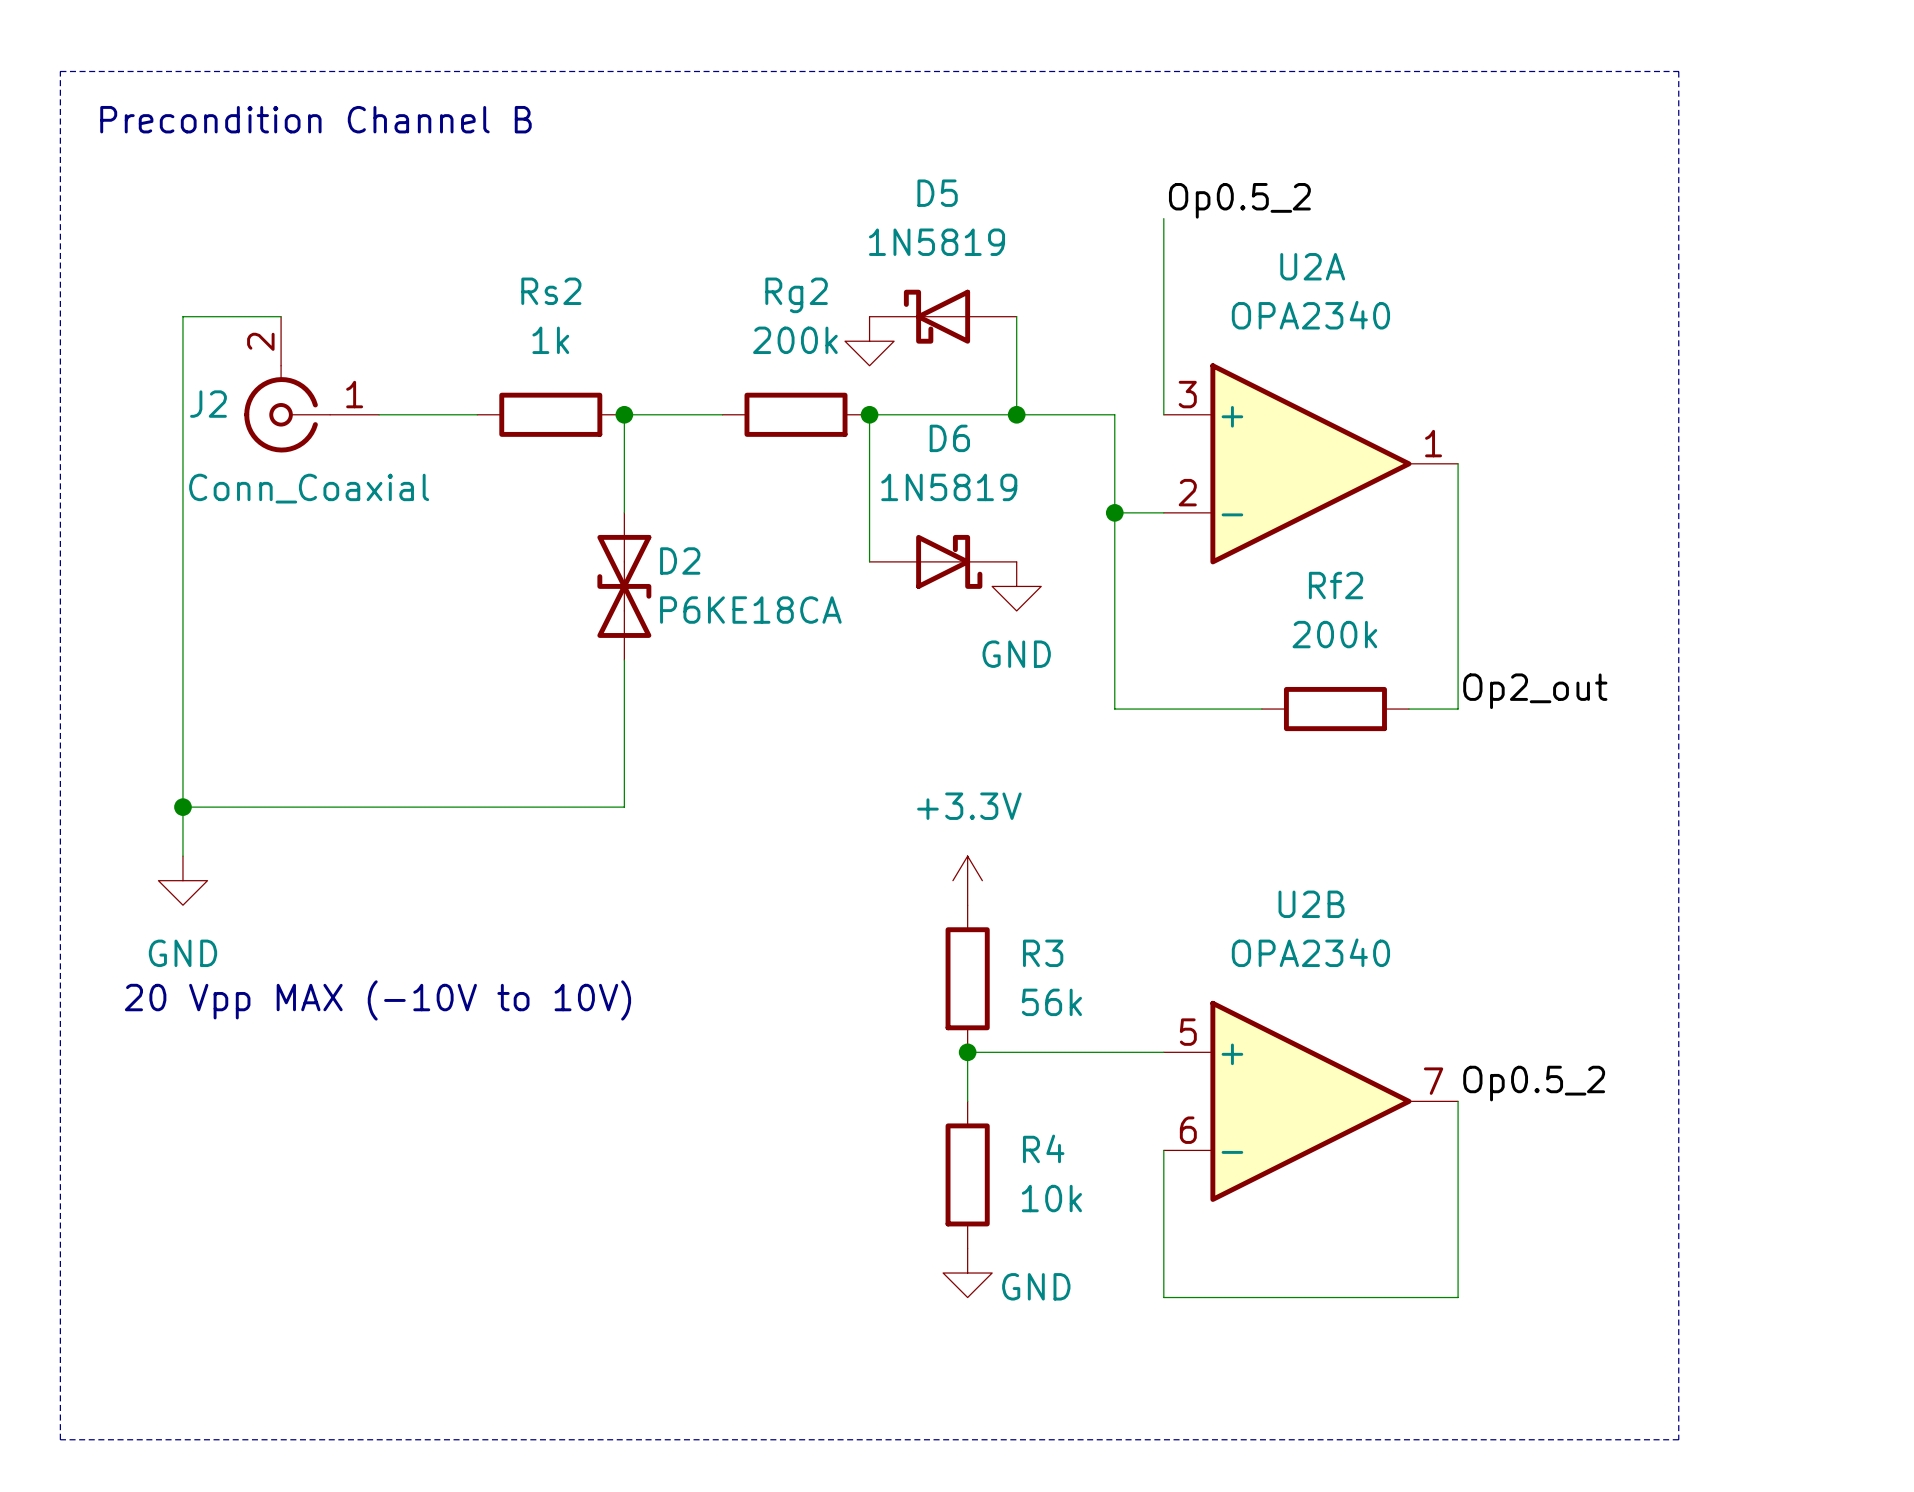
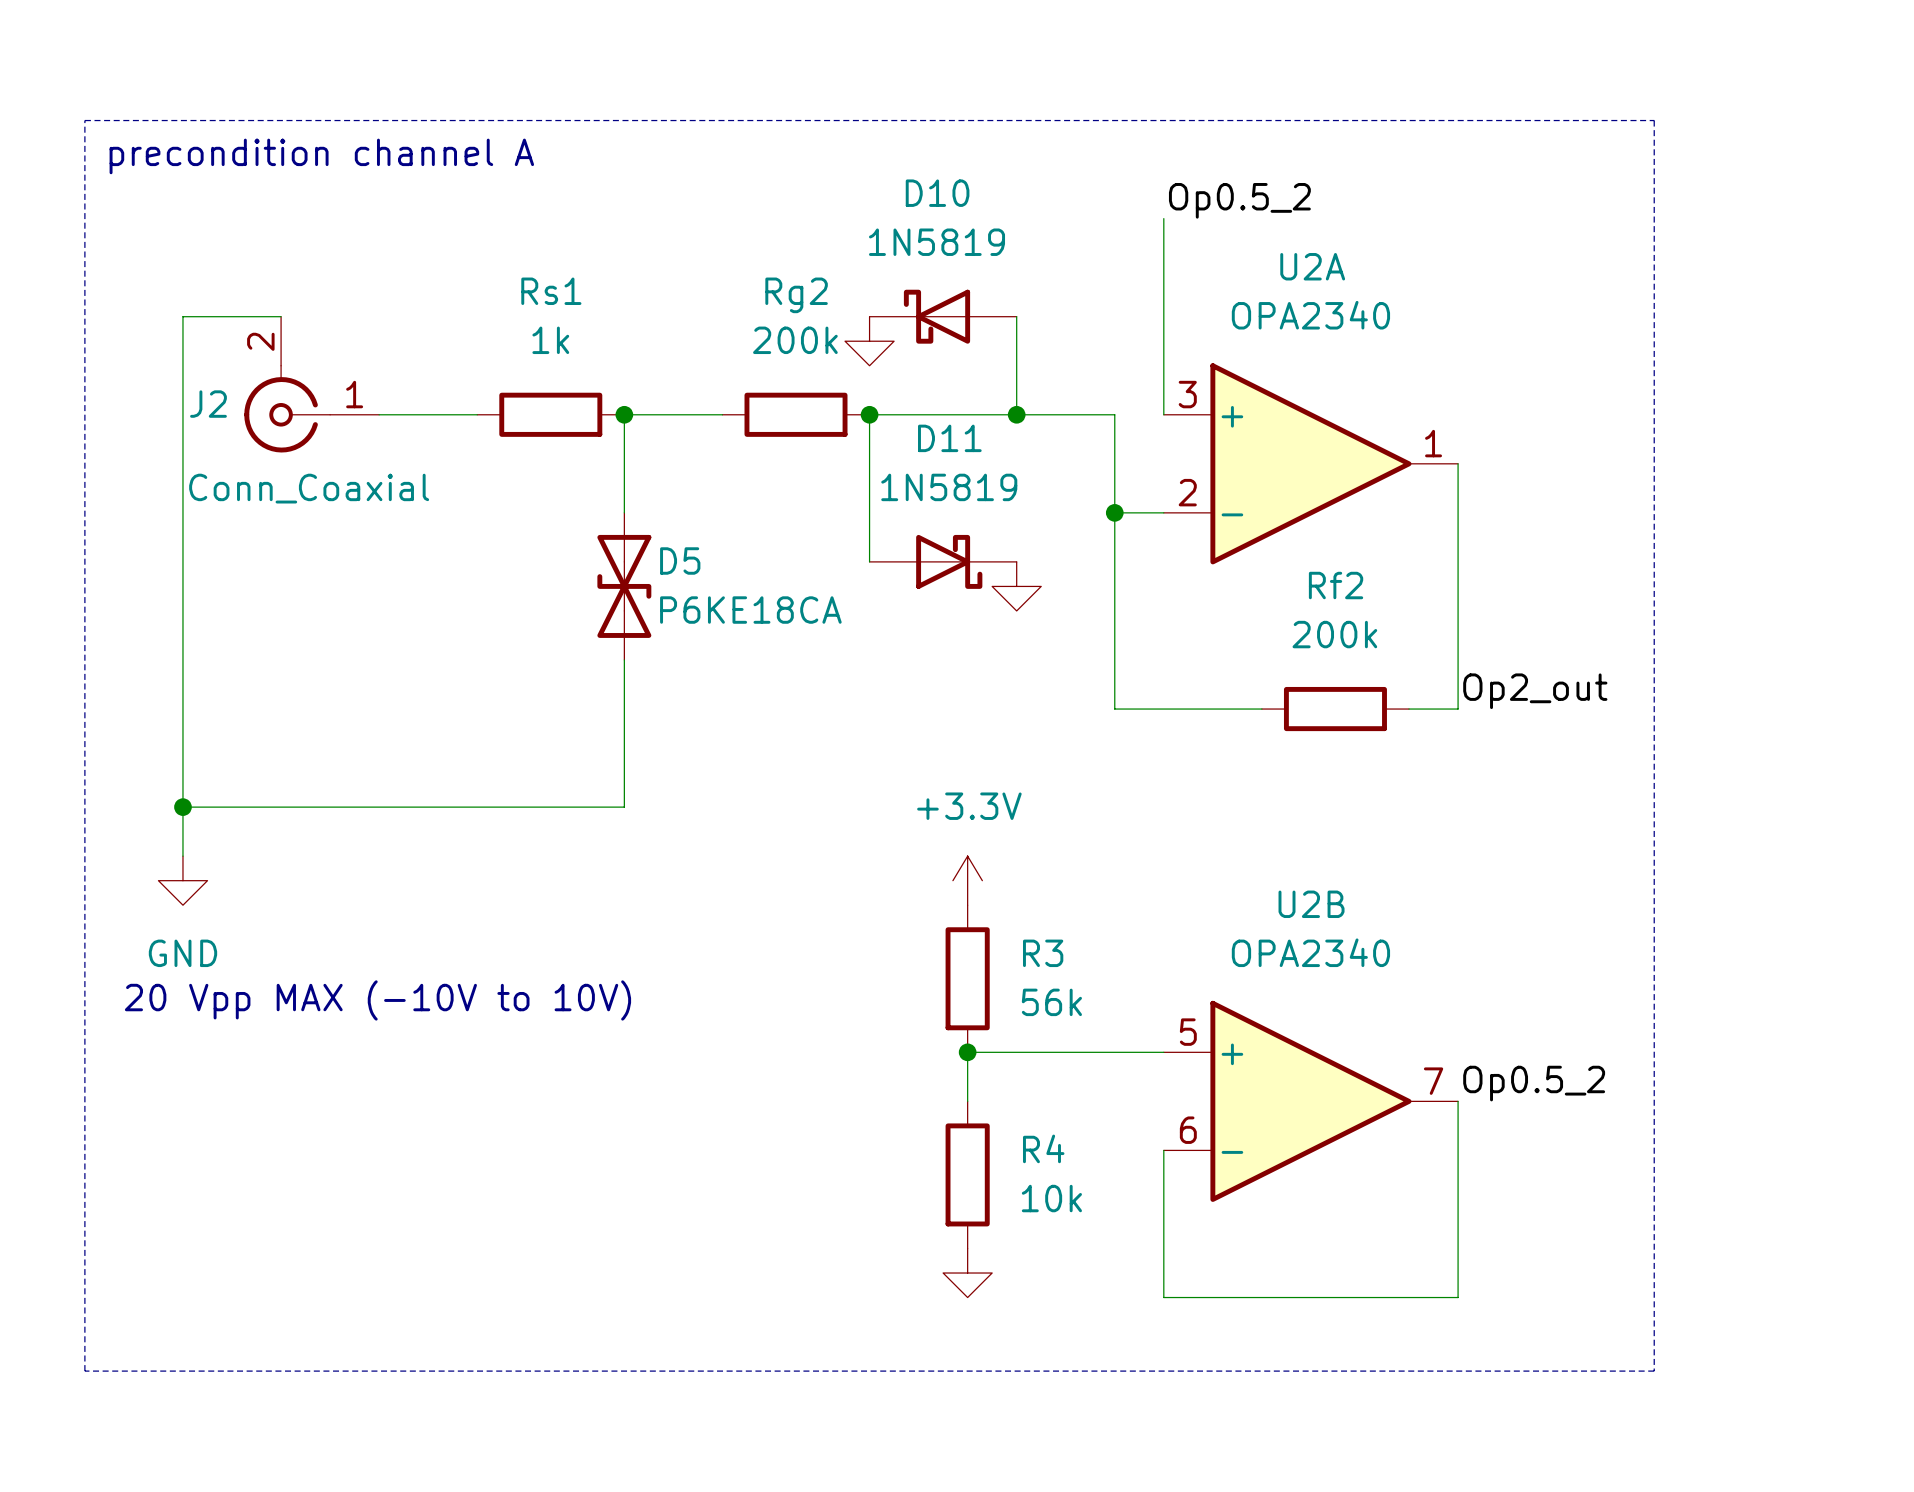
line: (60, 71) (1678, 71) (1678, 1439) (60, 1439) (60, 71) -> (84, 120) (84, 1371) (1654, 1371) (1654, 120) (84, 120)
text: Precondition Channel B (315, 119) -> precondition channel A (321, 156)
D5 name: D5 (937, 193) -> D10 (937, 193)
Rs2 name: Rs2 (551, 291) -> Rs1 (551, 291)
D6 name: D6 (949, 438) -> D11 (949, 438)
D2 name: D2 (680, 560) -> D5 (680, 560)
power symbol text: GND (1016, 654) -> none
power symbol text: GND (1036, 1286) -> none

